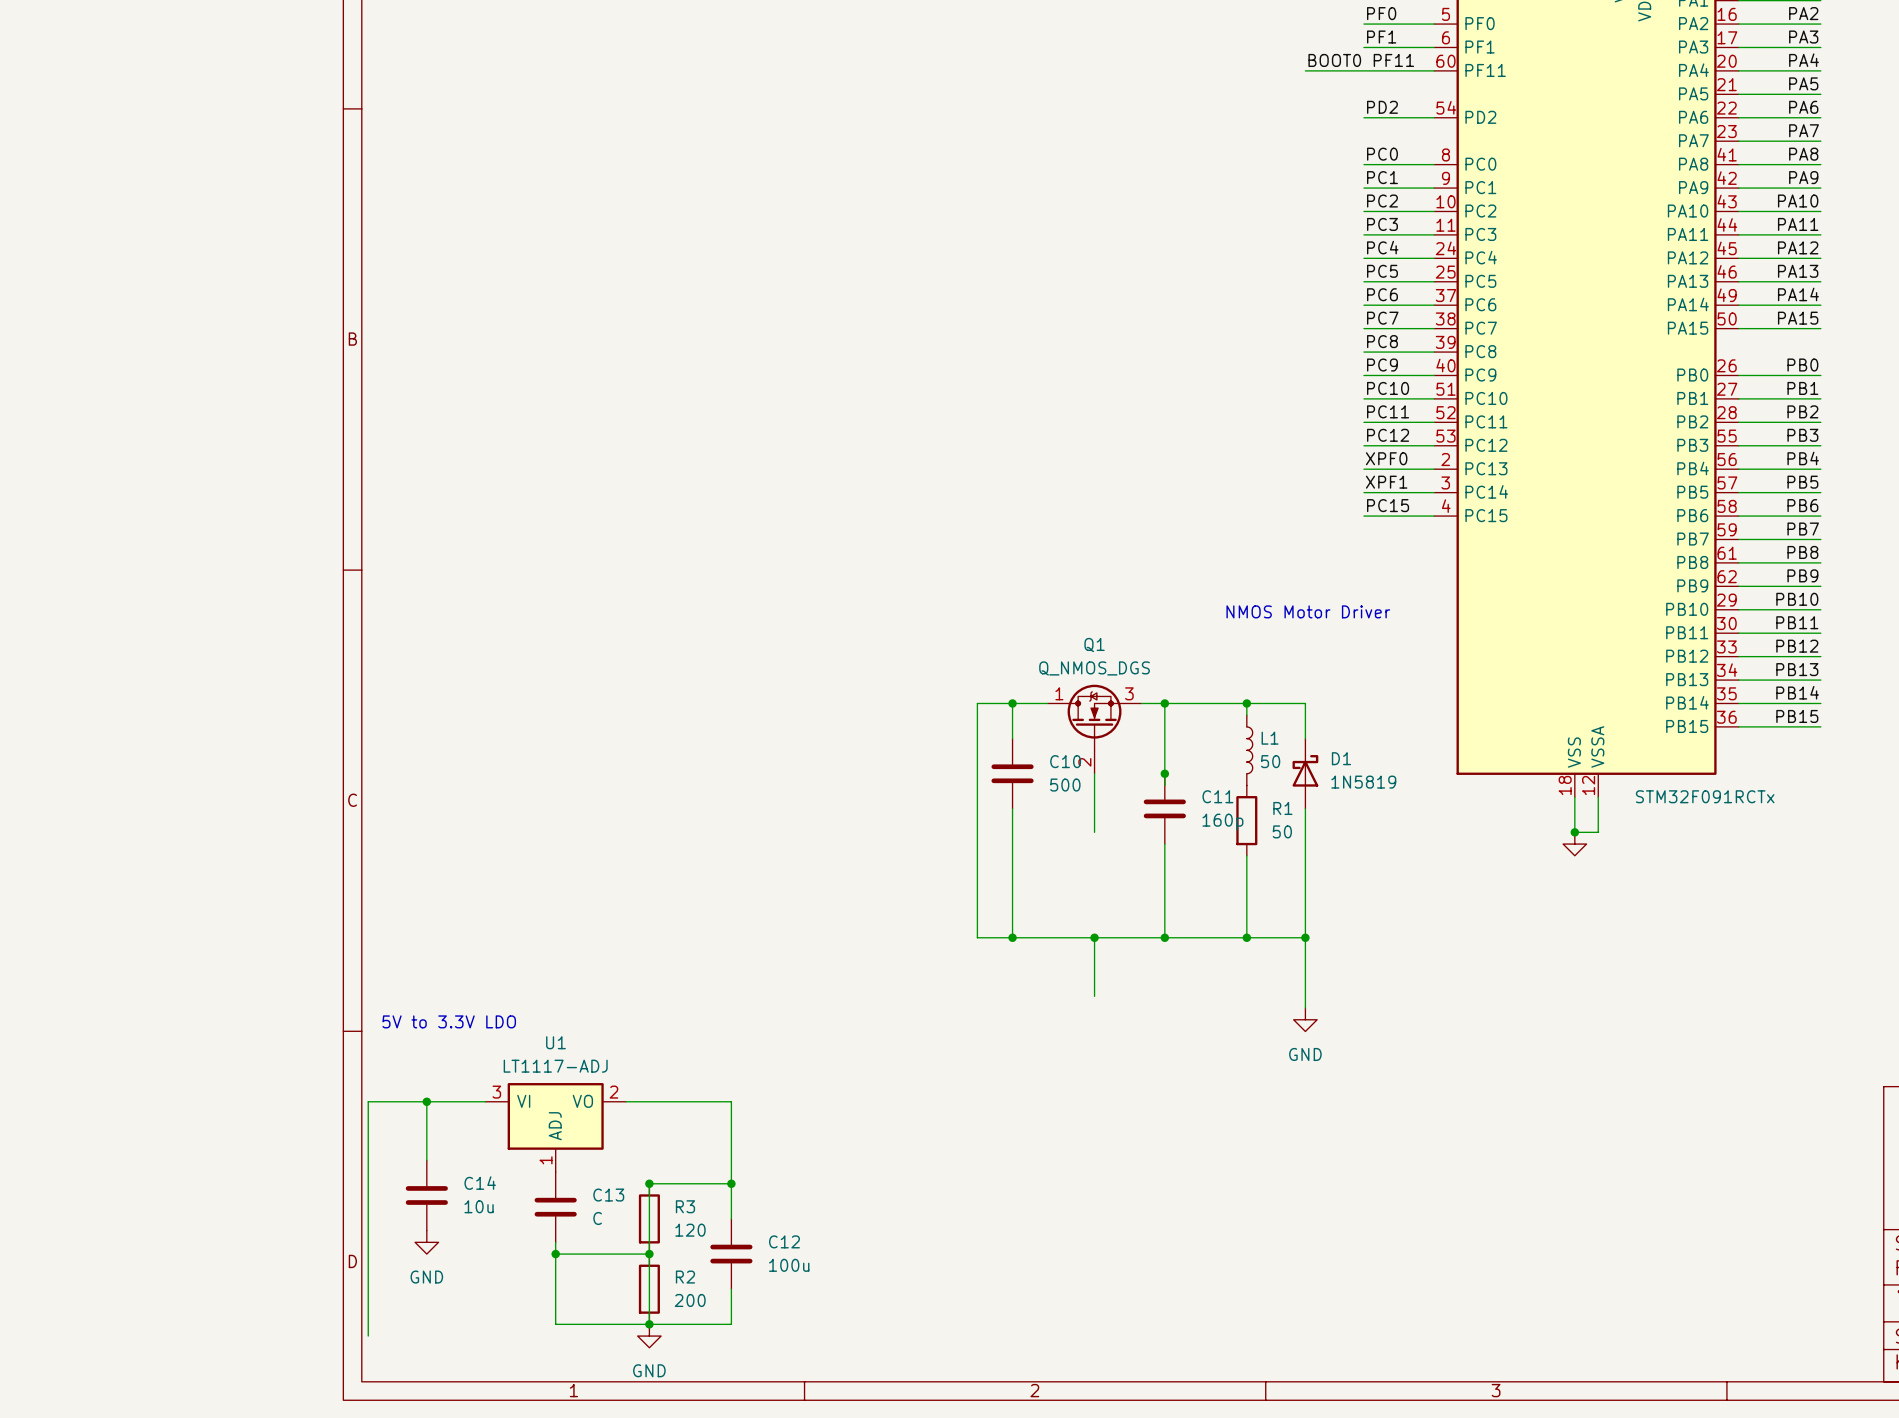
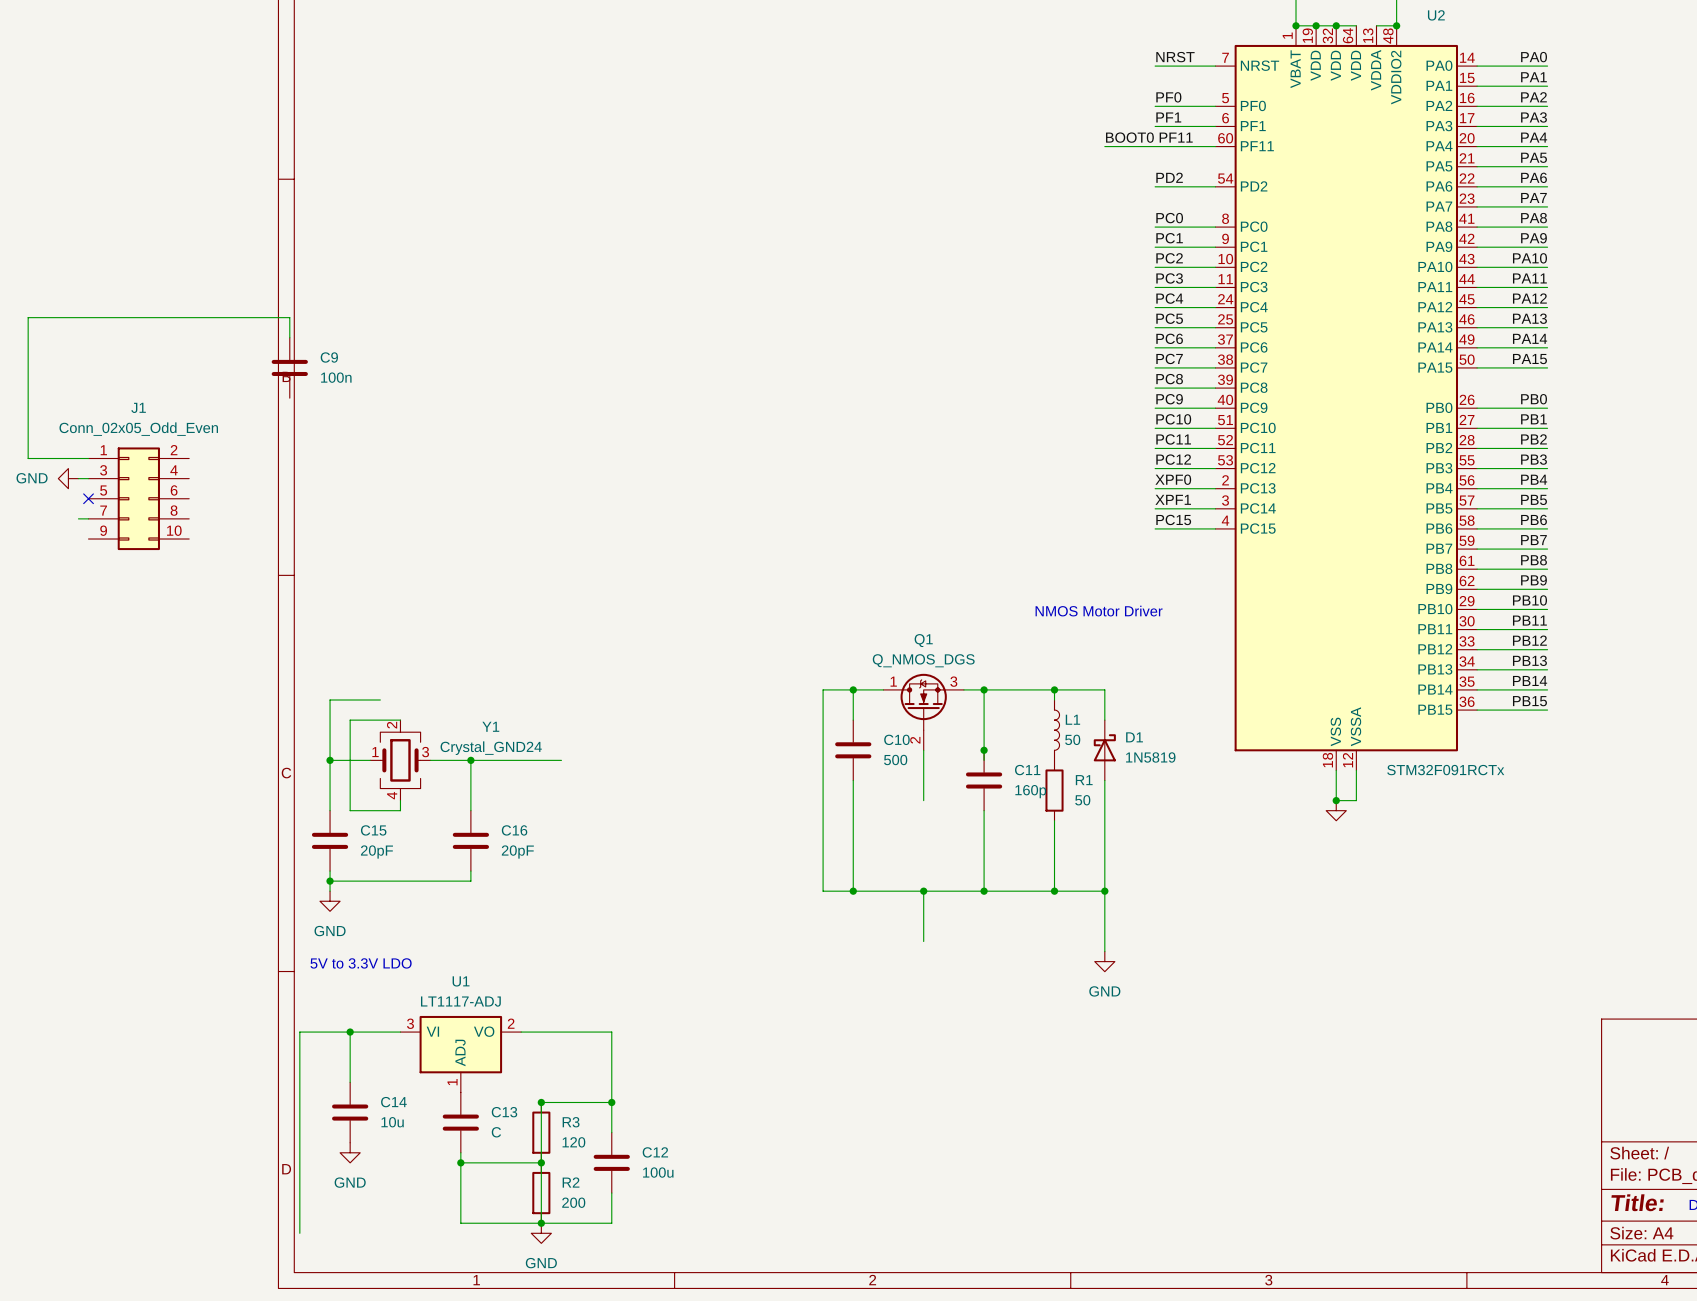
wire: none -> (289, 337) (289, 317) (28, 317) (28, 458) (88, 458)
C9: none -> 100n (289, 367)
power symbol: none -> GND (68, 478)
wire: none -> (78, 478) (88, 478)
no-connect mark: none -> (88, 498)
J1: none -> Conn_02x05_Odd_Even (138, 498)
wire: none -> (78, 518) (88, 518)
wire: none -> (380, 700) (330, 700) (330, 810)
wire: none -> (400, 720) (350, 720) (350, 810) (400, 810) (400, 800)
wire: none -> (330, 760) (370, 760)
junction: none -> (330, 760)
Y1: none -> Crystal_GND24 (400, 760)
wire: none -> (430, 760) (561, 760)
wire: none -> (470, 760) (470, 810)
junction: none -> (470, 760)
C15: none -> 20pF (330, 840)
C16: none -> 20pF (470, 840)
wire: none -> (330, 871) (330, 891)
wire: none -> (470, 871) (470, 881) (330, 881)
junction: none -> (330, 881)
power symbol: none -> GND (330, 901)

